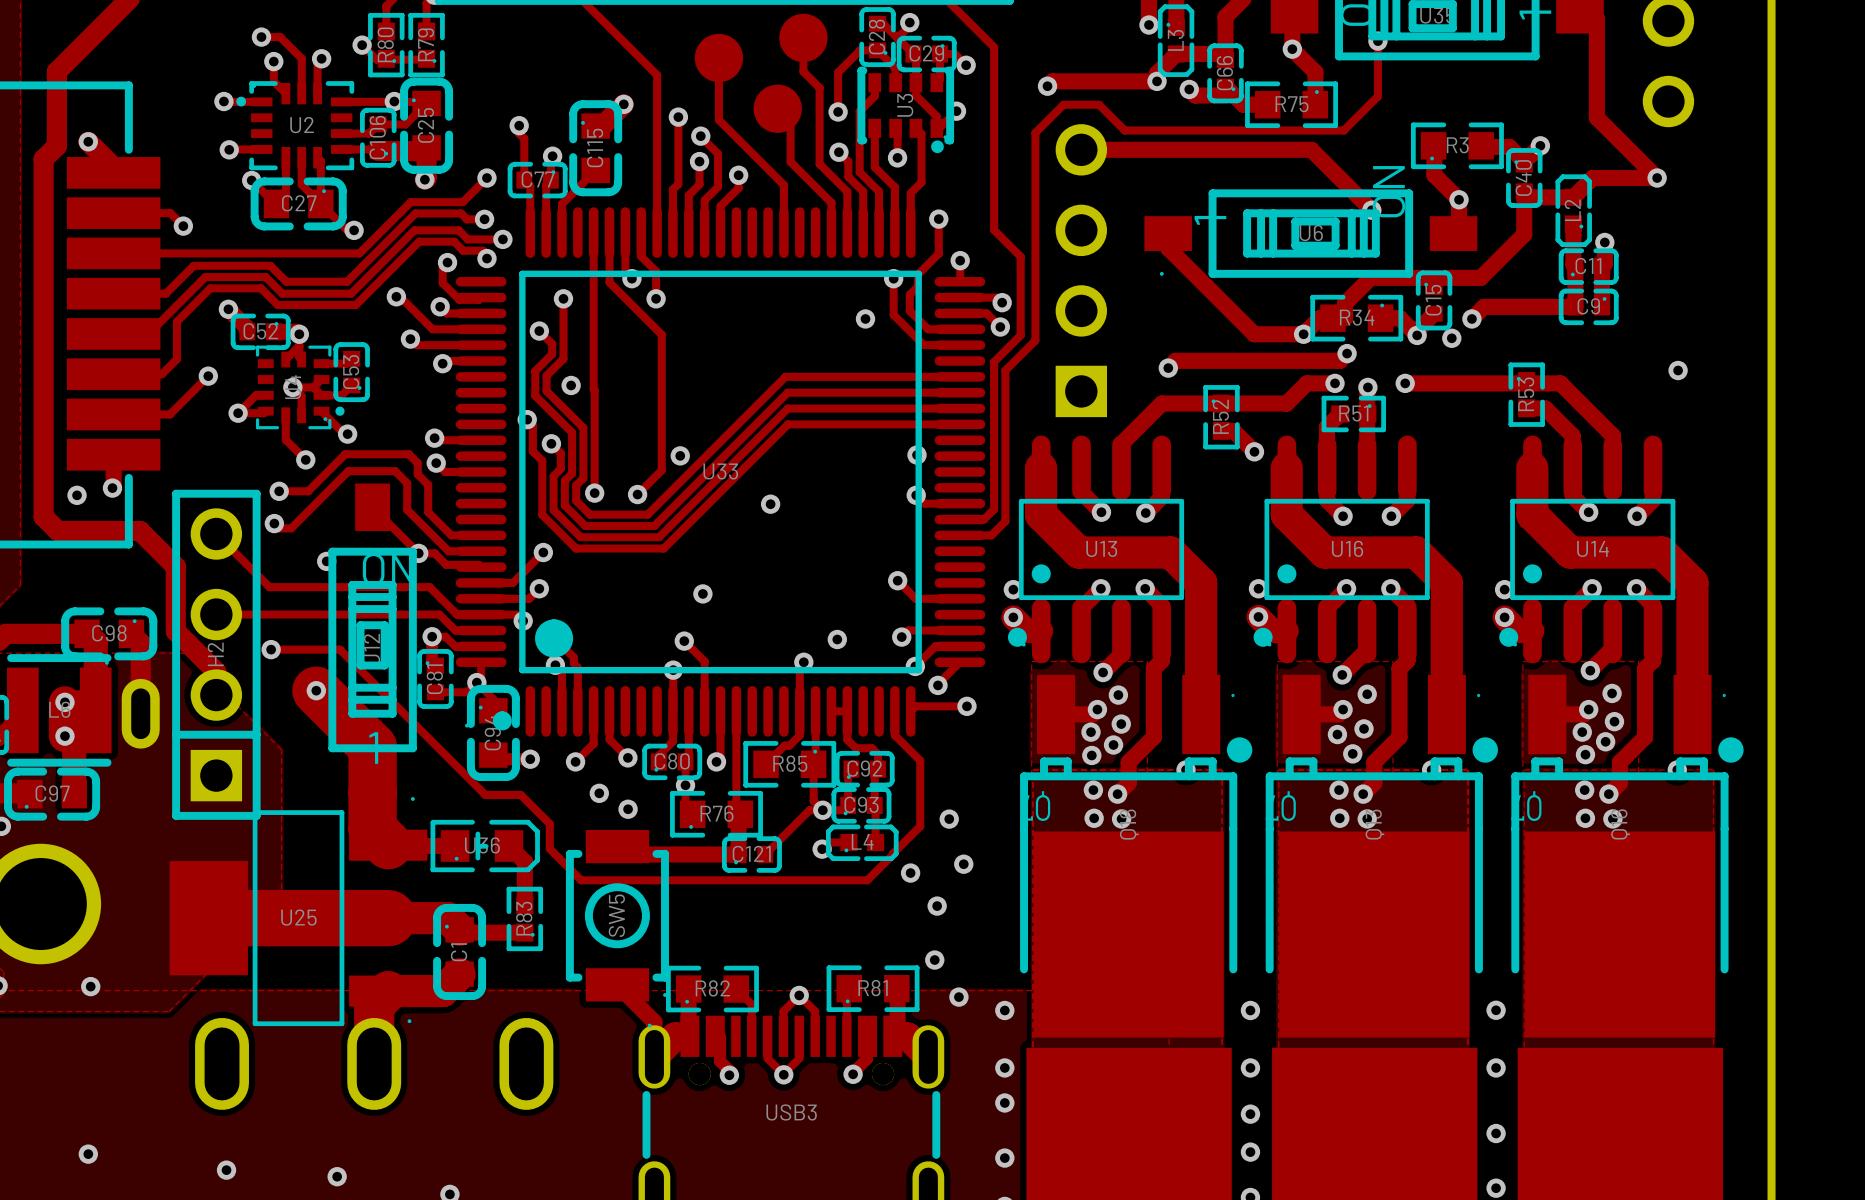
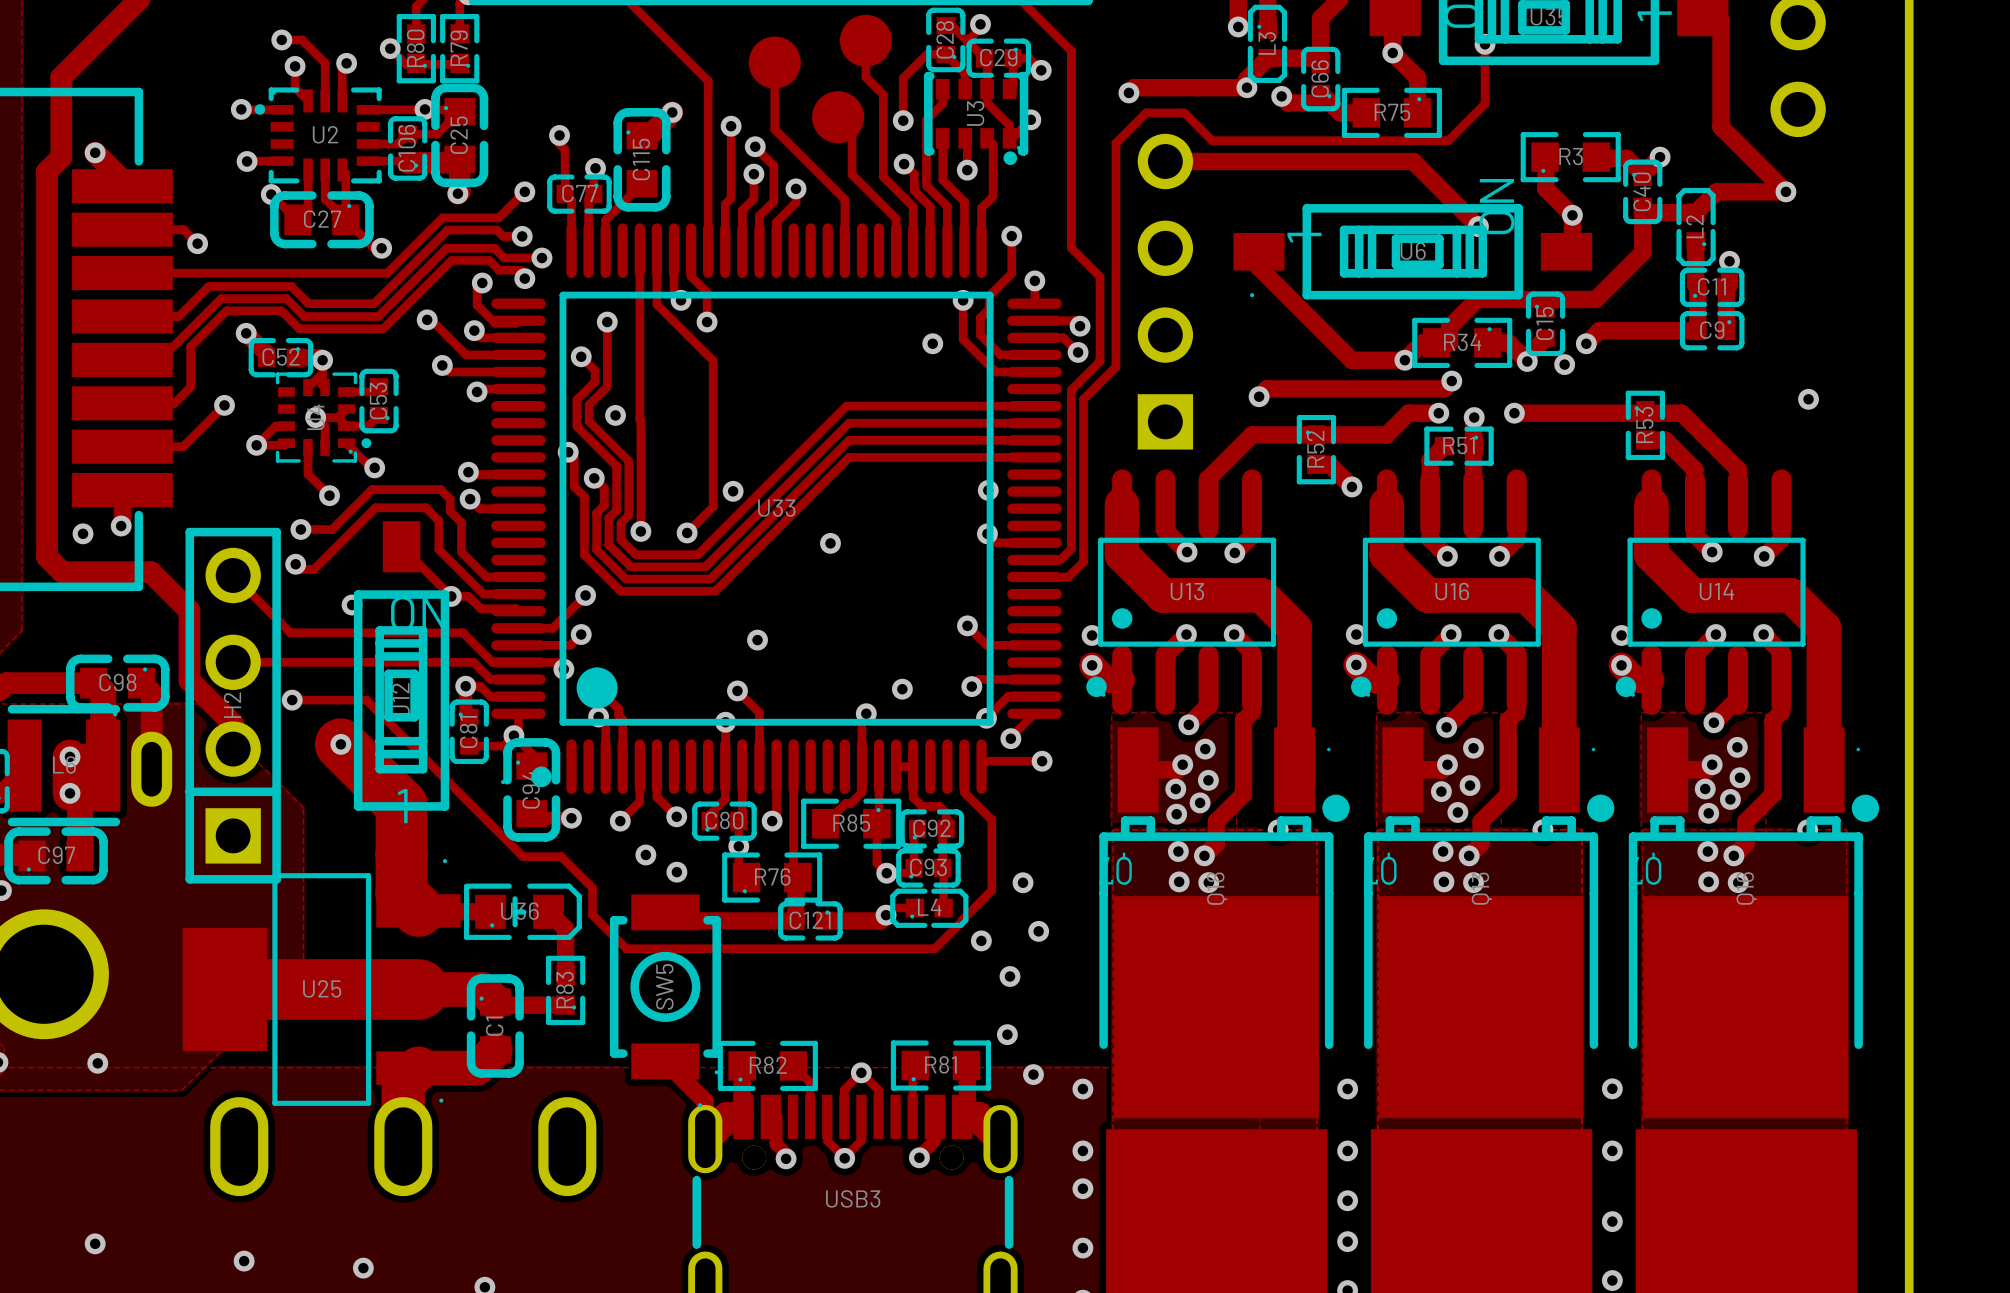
track: (822, 810) (809, 810) (765, 854) -> (886, 915) (880, 920) (824, 920)
C121 rotation: 0° (751, 854) -> 180° (810, 920)

